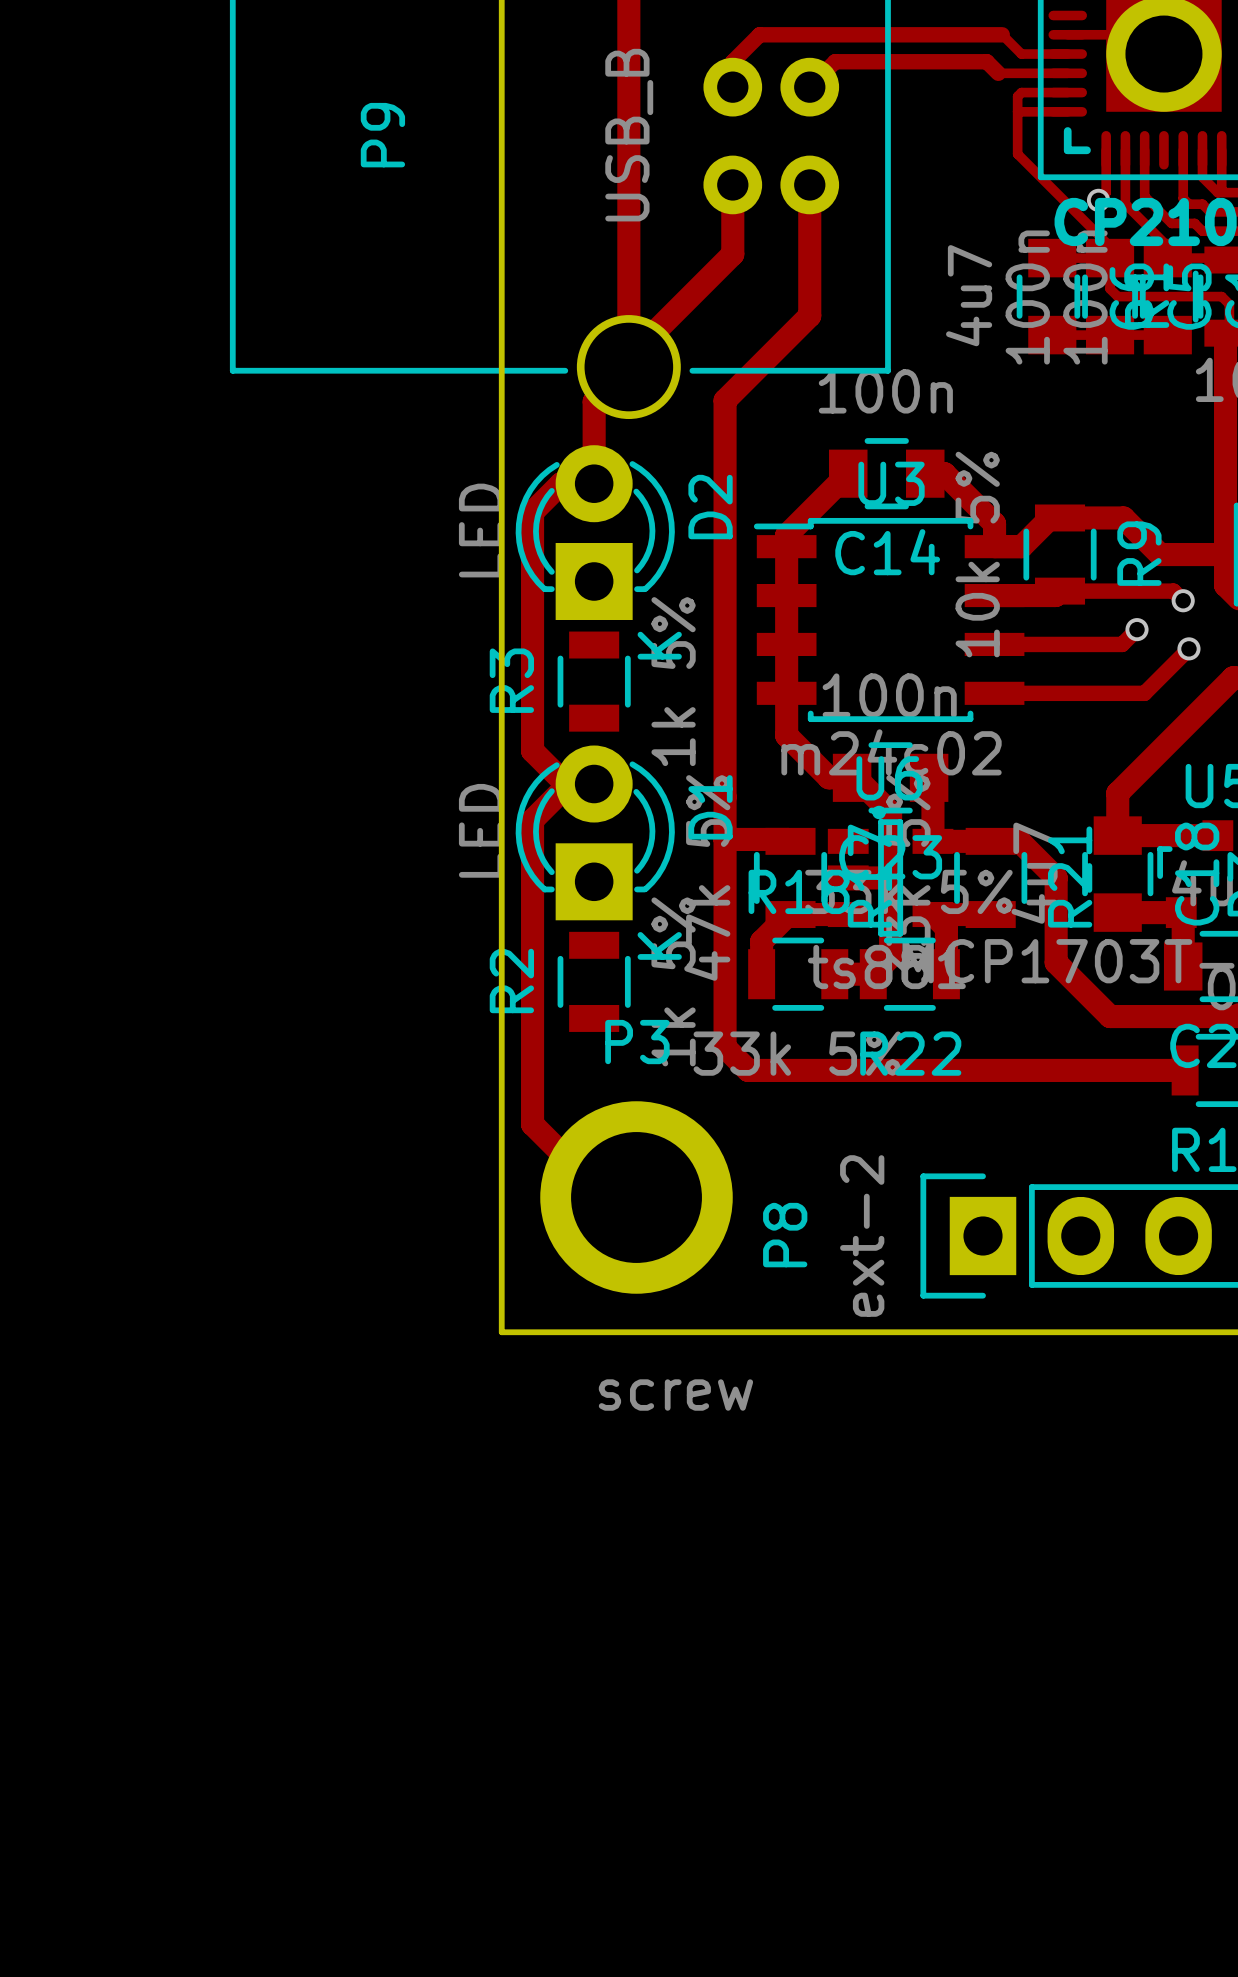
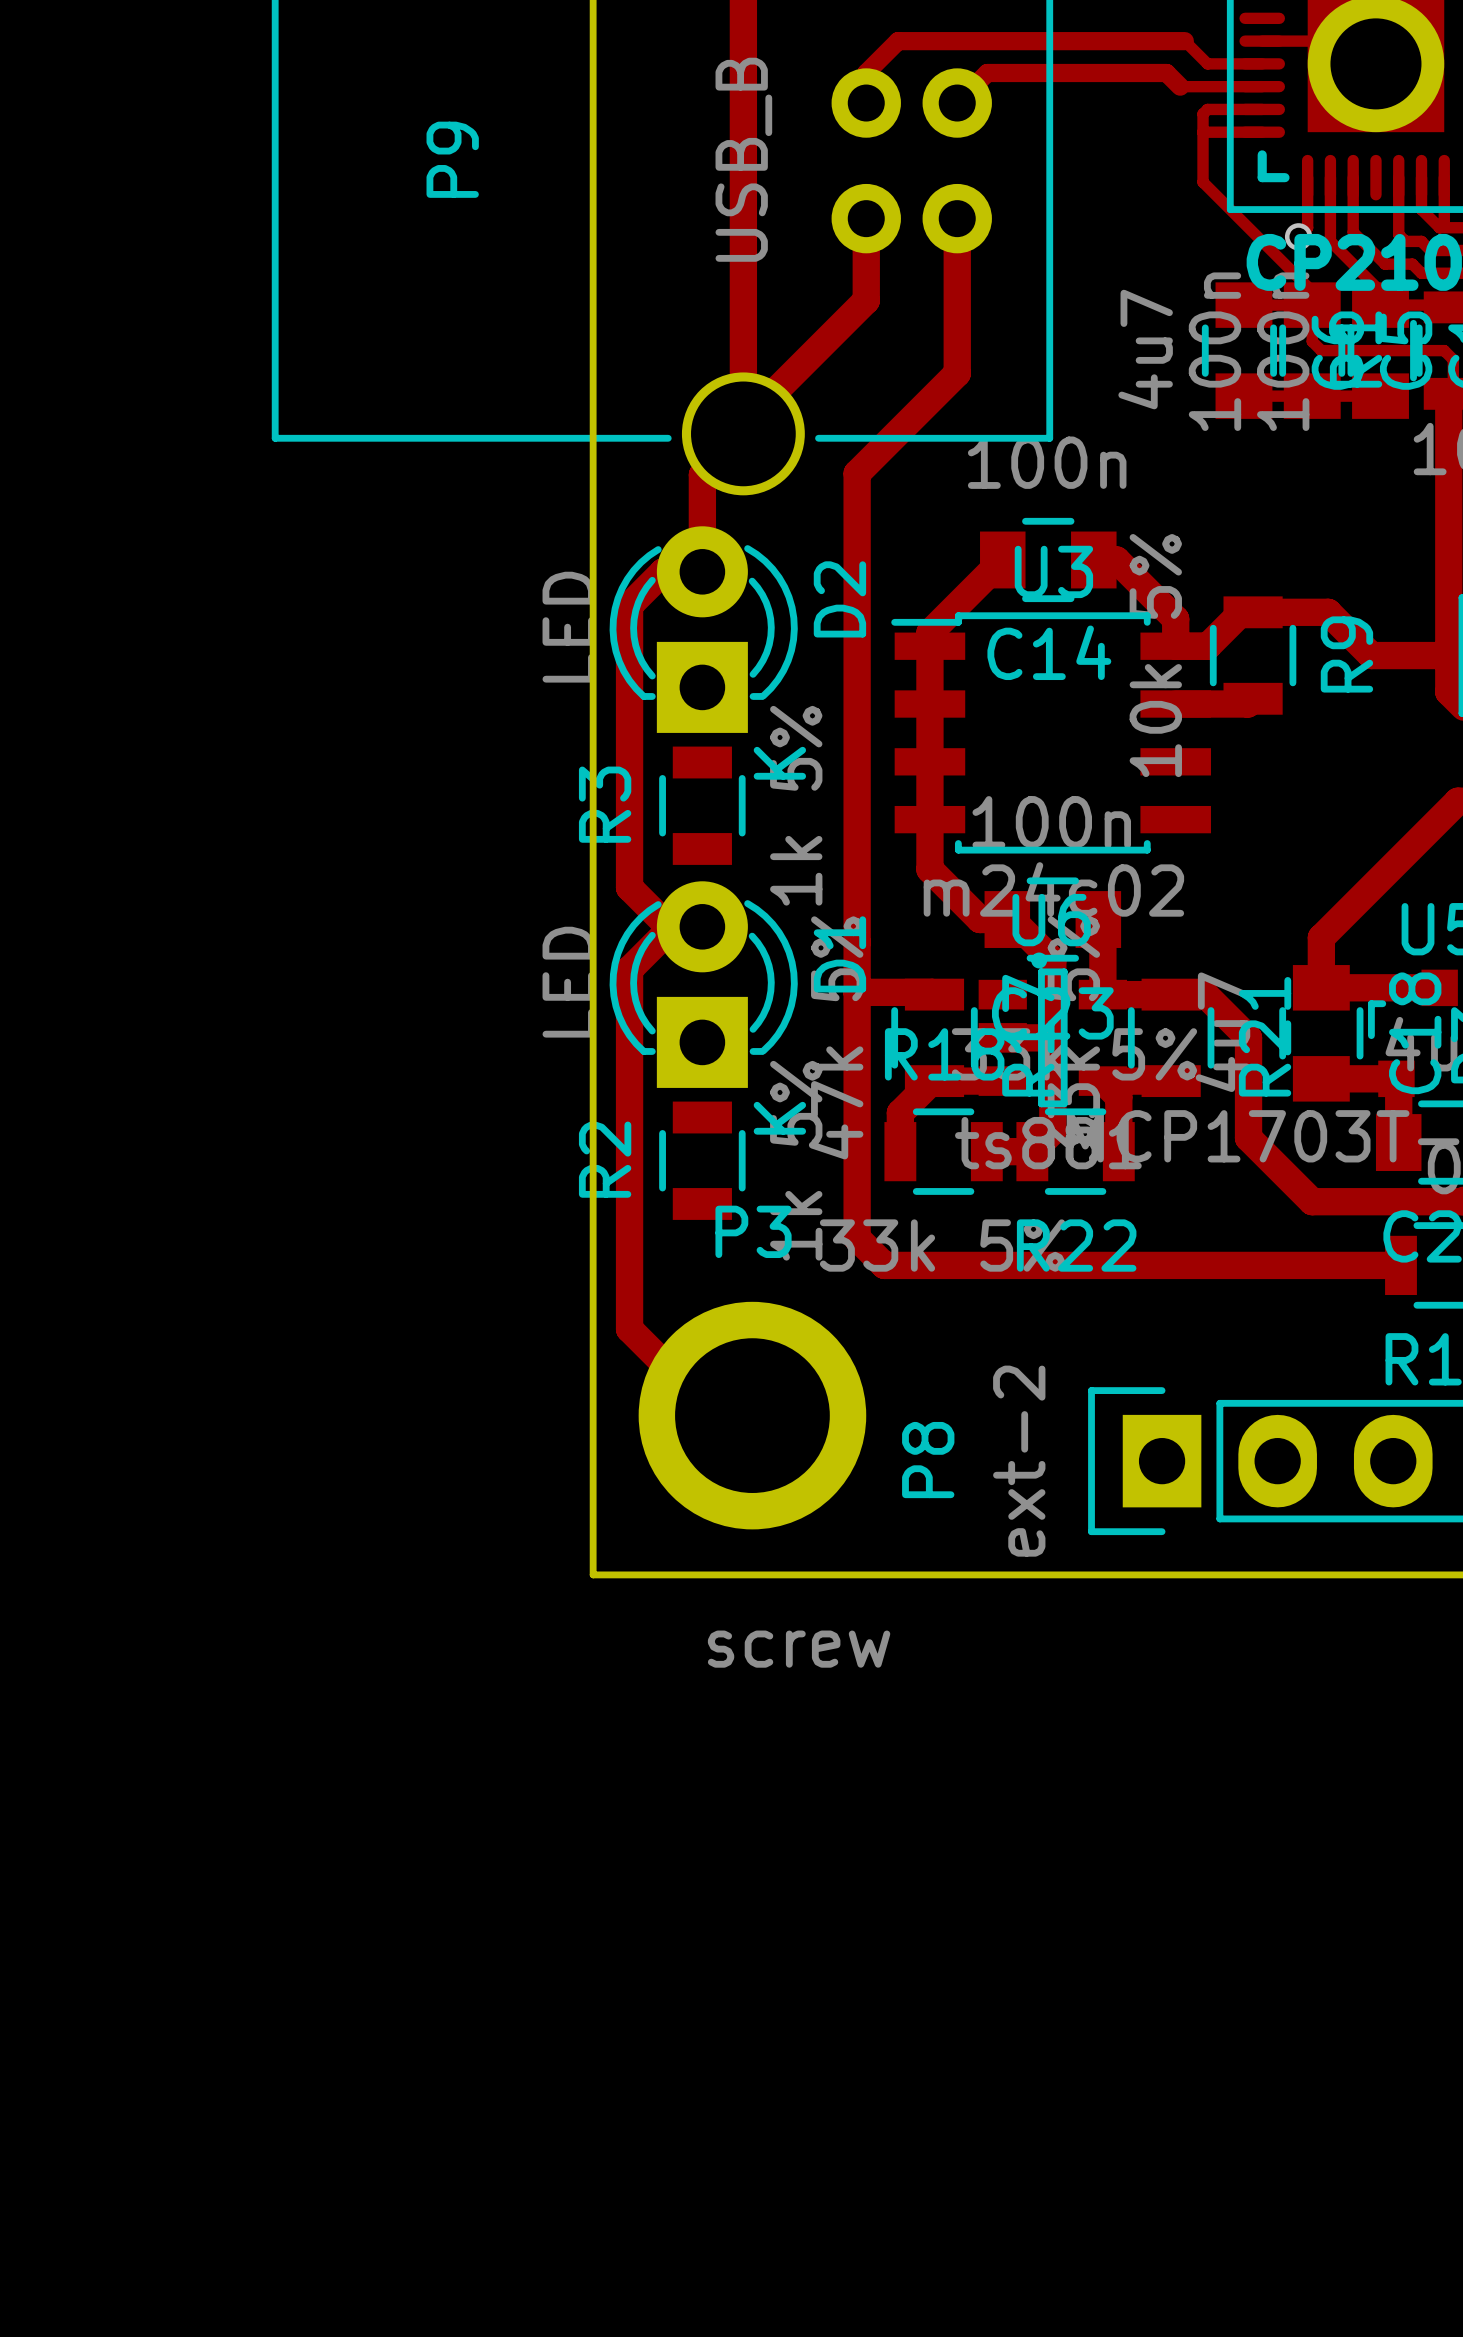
track: (1060, 591) (1173, 591) (1183, 600) -> none
via: (1183, 600) -> none
track: (1137, 629) (1122, 644) (994, 644) -> none
via: (1137, 629) -> none
track: (1188, 648) (1144, 693) (994, 693) -> none
via: (1188, 648) -> none

